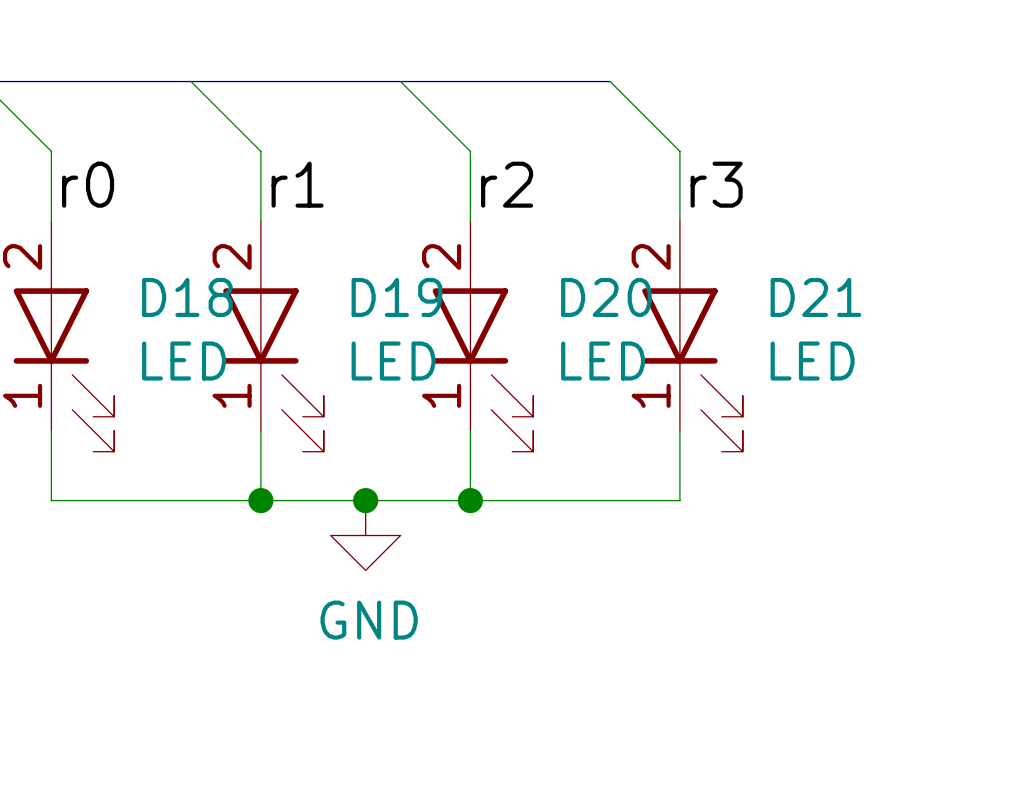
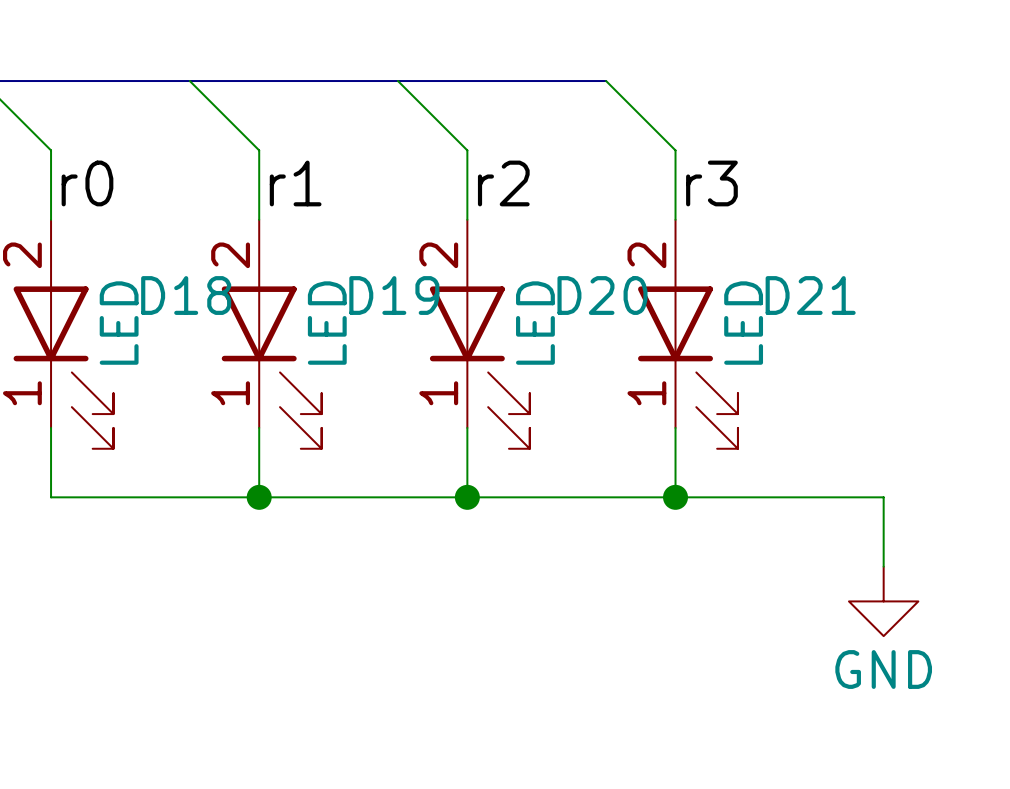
D18 value rotation: 0° (184, 361) -> 90° counterclockwise (119, 323)
D19 value rotation: 0° (393, 361) -> 90° counterclockwise (327, 323)
D20 value rotation: 0° (603, 361) -> 90° counterclockwise (535, 323)
D21 value rotation: 0° (812, 361) -> 90° counterclockwise (743, 323)
junction: (365, 500) -> none
wire: none -> (675, 497) (883, 497) (883, 566)
junction: none -> (675, 497)
power symbol position: GND (365, 535) -> GND (883, 601)
power symbol text position: GND (369, 620) -> GND (883, 669)

